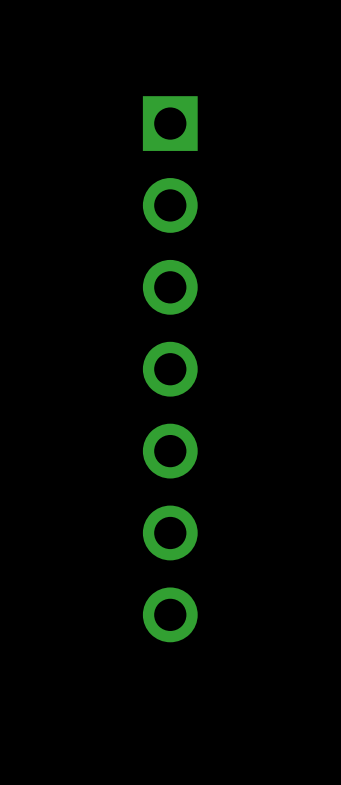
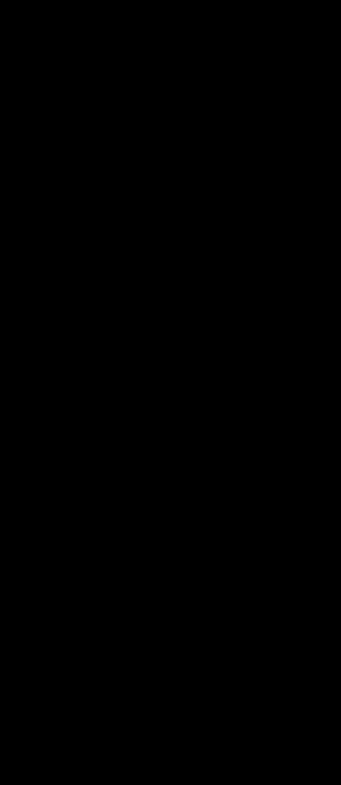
part: (170, 369) -> none

